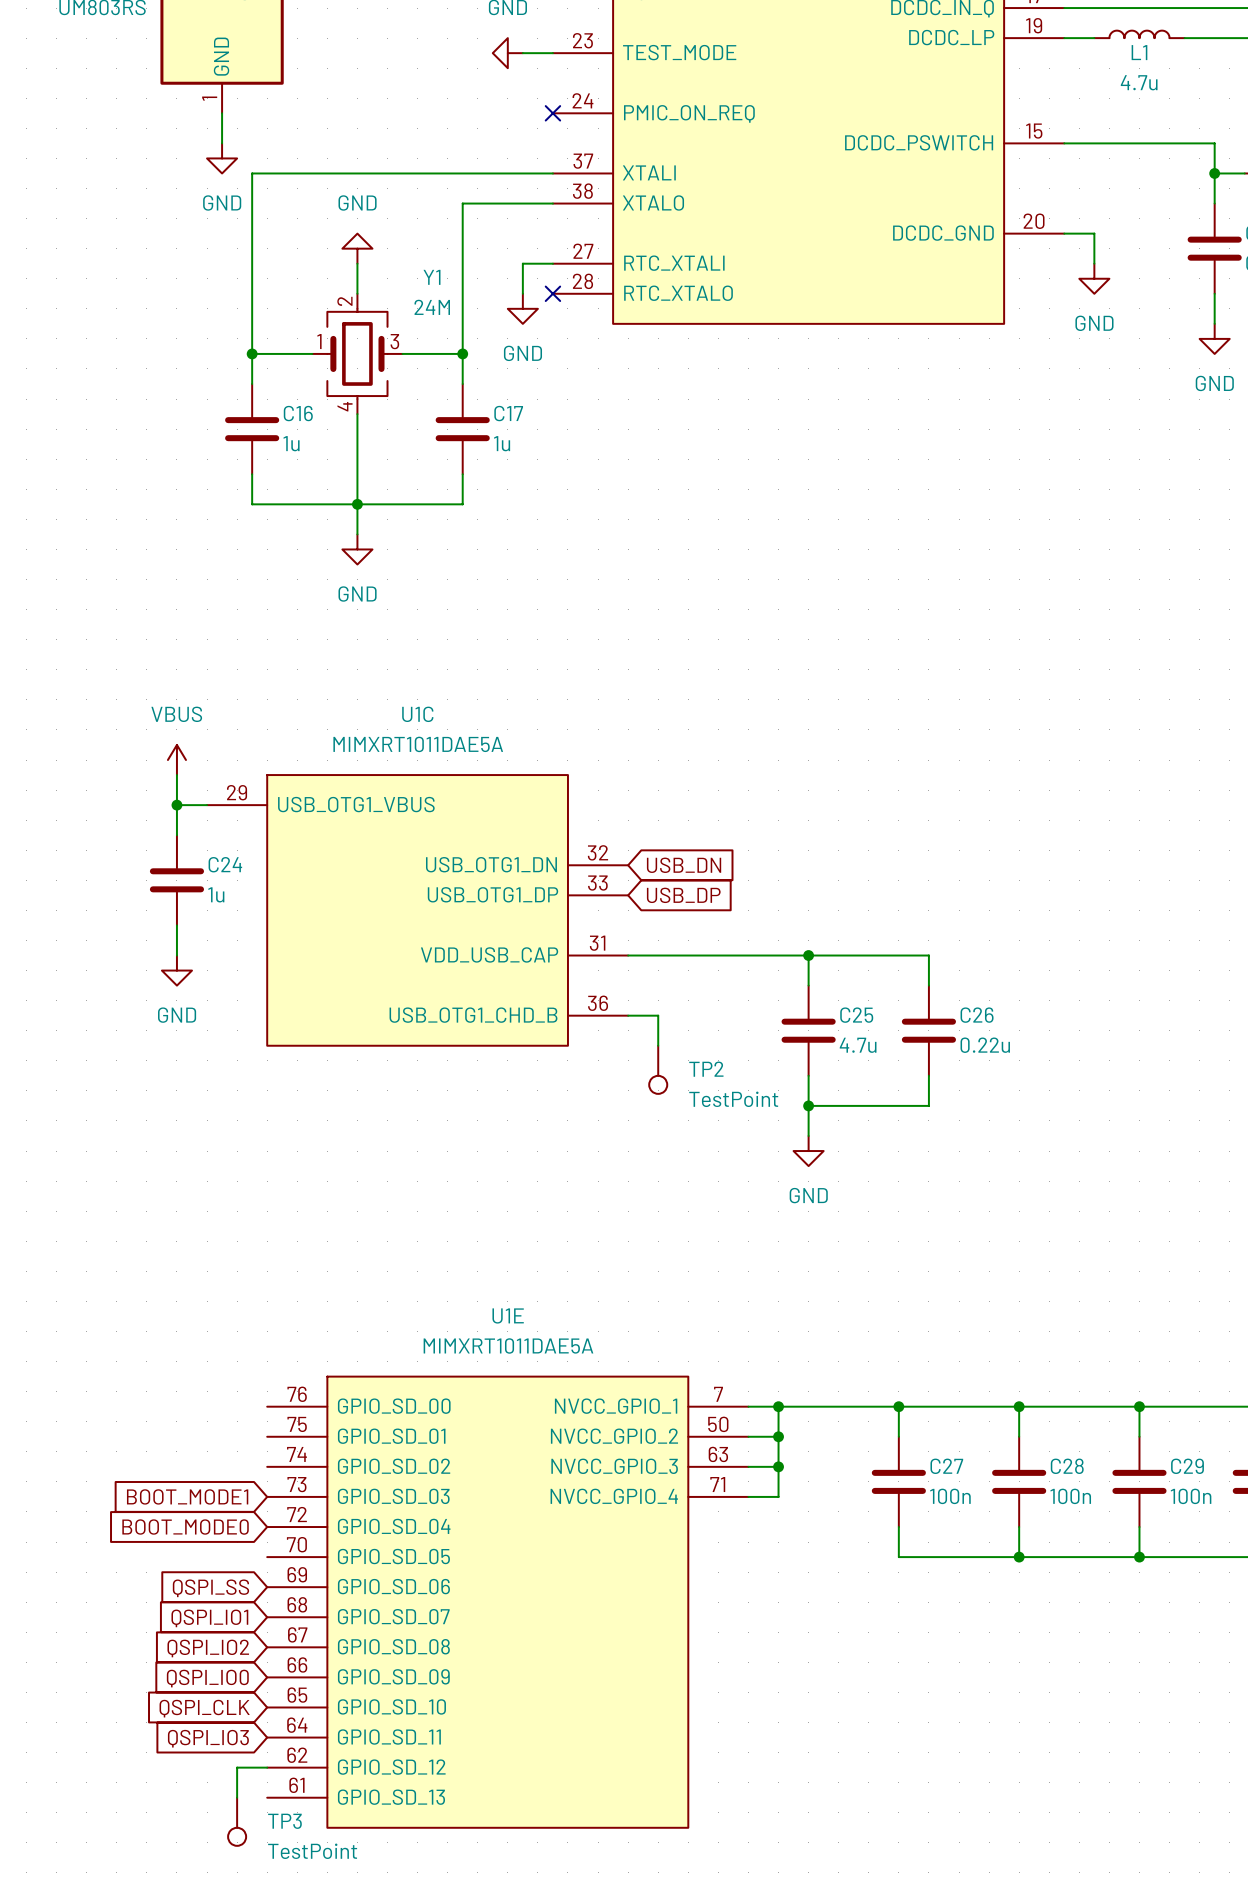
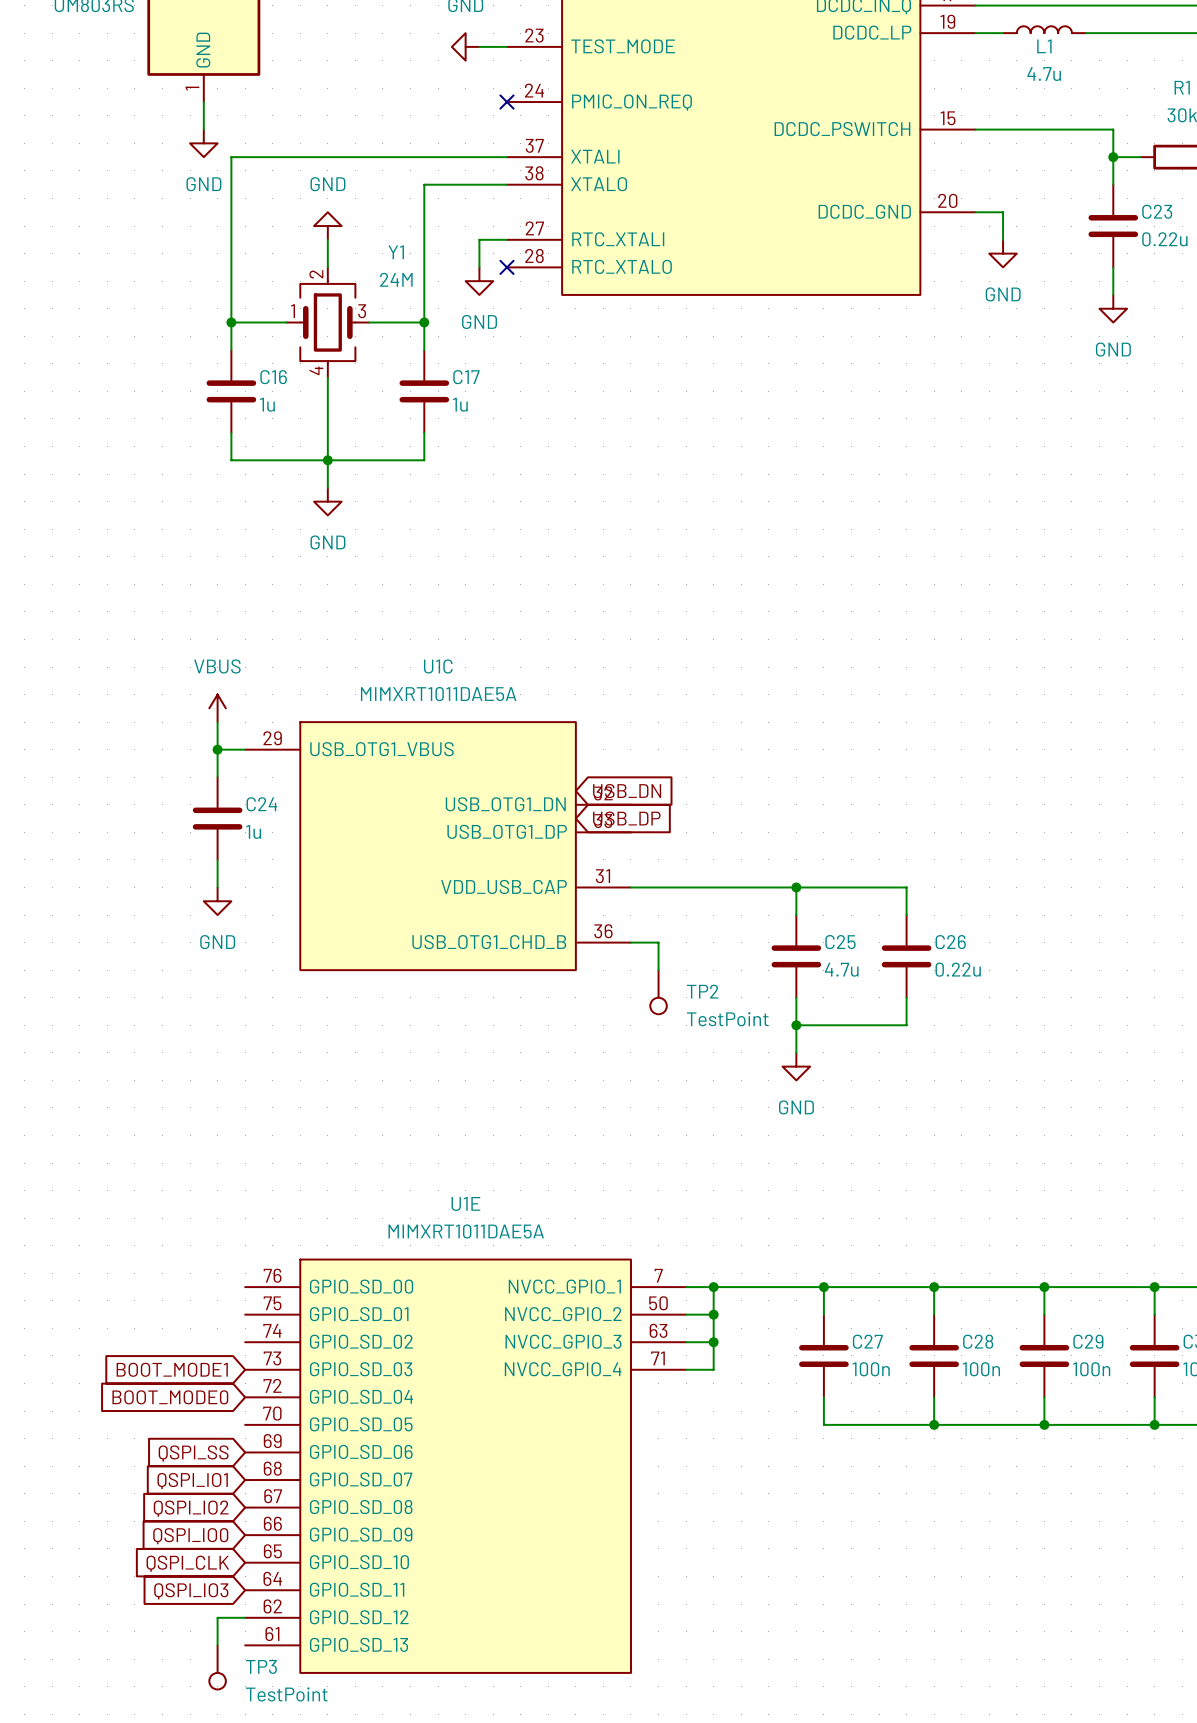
power symbol position: VBUS (176, 760) -> VBUS (217, 708)
wire: (176, 775) (176, 835) -> (217, 722) (217, 777)
wire: (176, 805) (207, 805) -> (217, 749) (245, 749)
junction position: (176, 805) -> (217, 749)
C24 position: (176, 880) -> (217, 818)
U1C position: (417, 910) -> (438, 846)
wire: (176, 925) (176, 955) -> (217, 859) (217, 887)
wire: (628, 955) (928, 955) (928, 985) -> (630, 887) (906, 887) (906, 915)
wire: (808, 955) (808, 985) -> (796, 887) (796, 915)
junction position: (808, 955) -> (796, 887)
power symbol position: GND (176, 970) -> GND (217, 901)
wire: (628, 1015) (658, 1015) (658, 1045) -> (630, 942) (658, 942) (658, 970)
C25 position: (808, 1030) -> (796, 956)
C26 position: (928, 1030) -> (906, 956)
TP2 position: (658, 1069) -> (658, 992)
wire: (808, 1075) (808, 1135) -> (796, 997) (796, 1052)
wire: (928, 1075) (928, 1105) (808, 1105) -> (906, 997) (906, 1025) (796, 1025)
junction position: (808, 1105) -> (796, 1025)
power symbol position: GND (808, 1151) -> GND (796, 1066)

